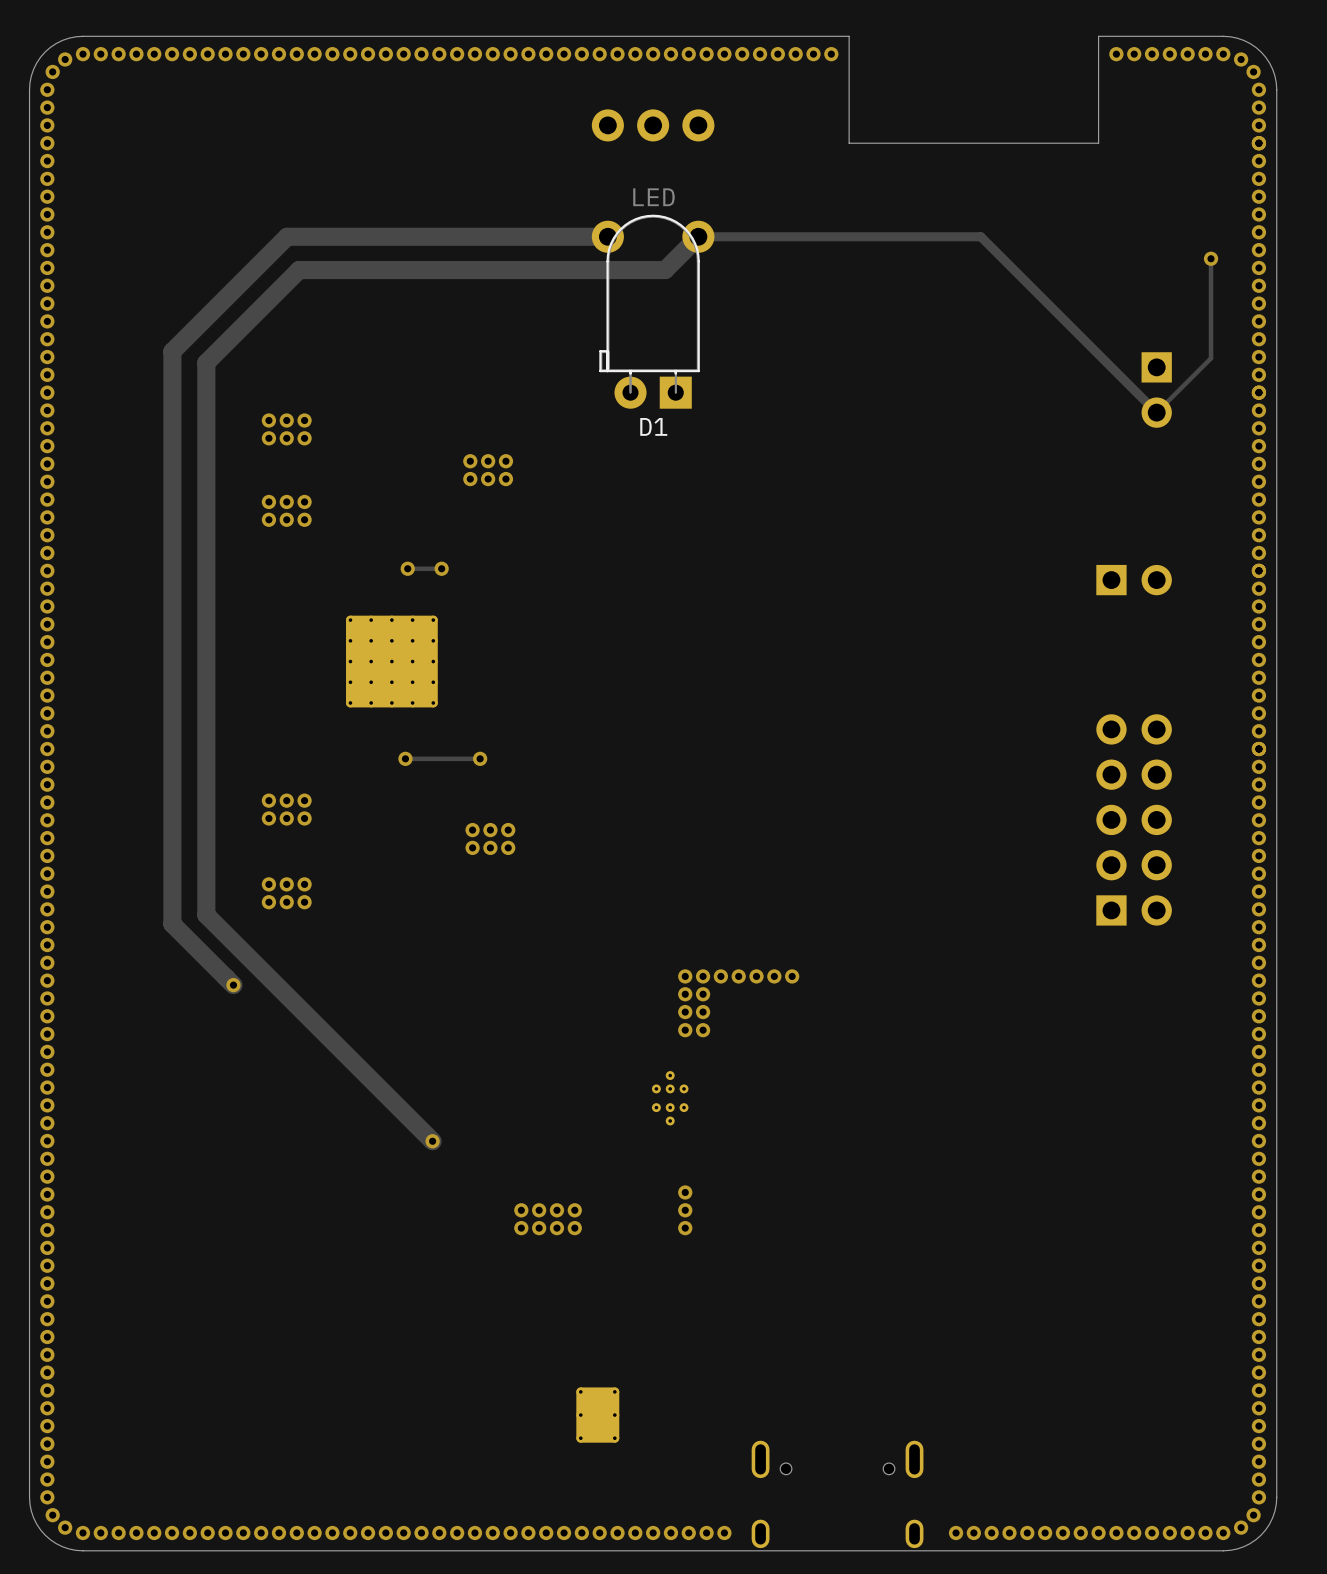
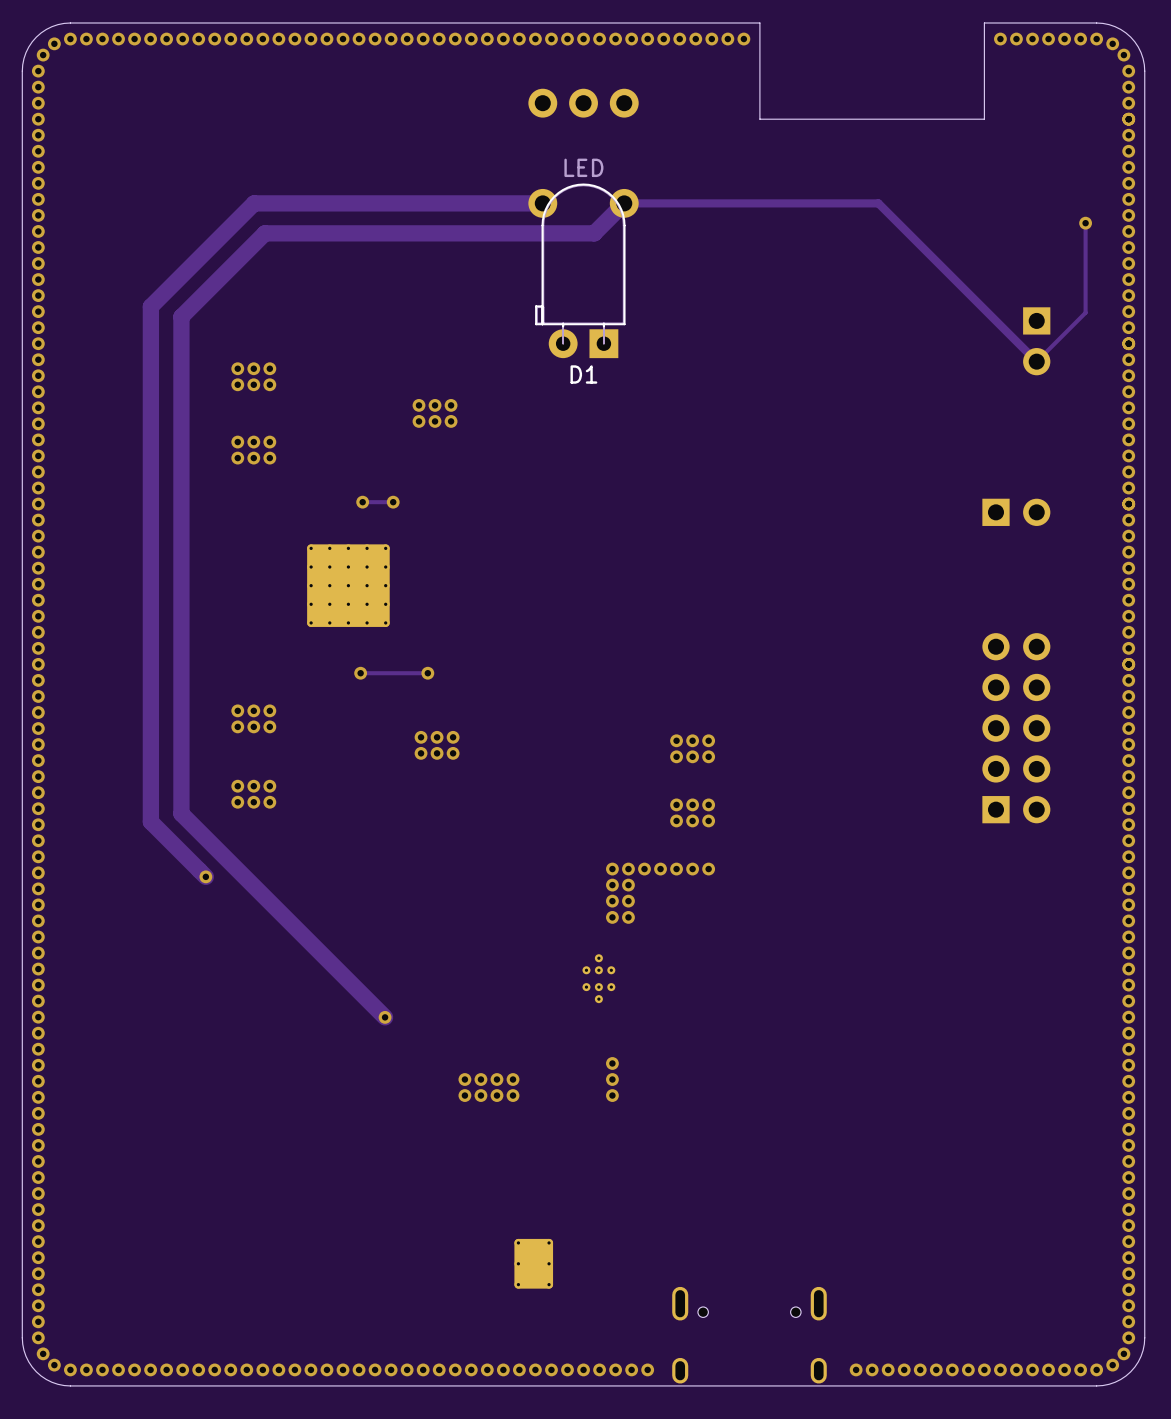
via: none -> (676, 740)
via: none -> (692, 740)
via: none -> (708, 740)
via: none -> (676, 756)
via: none -> (692, 756)
via: none -> (708, 756)
via: none -> (676, 804)
via: none -> (692, 804)
via: none -> (708, 804)
via: none -> (676, 820)
via: none -> (692, 820)
via: none -> (708, 820)

